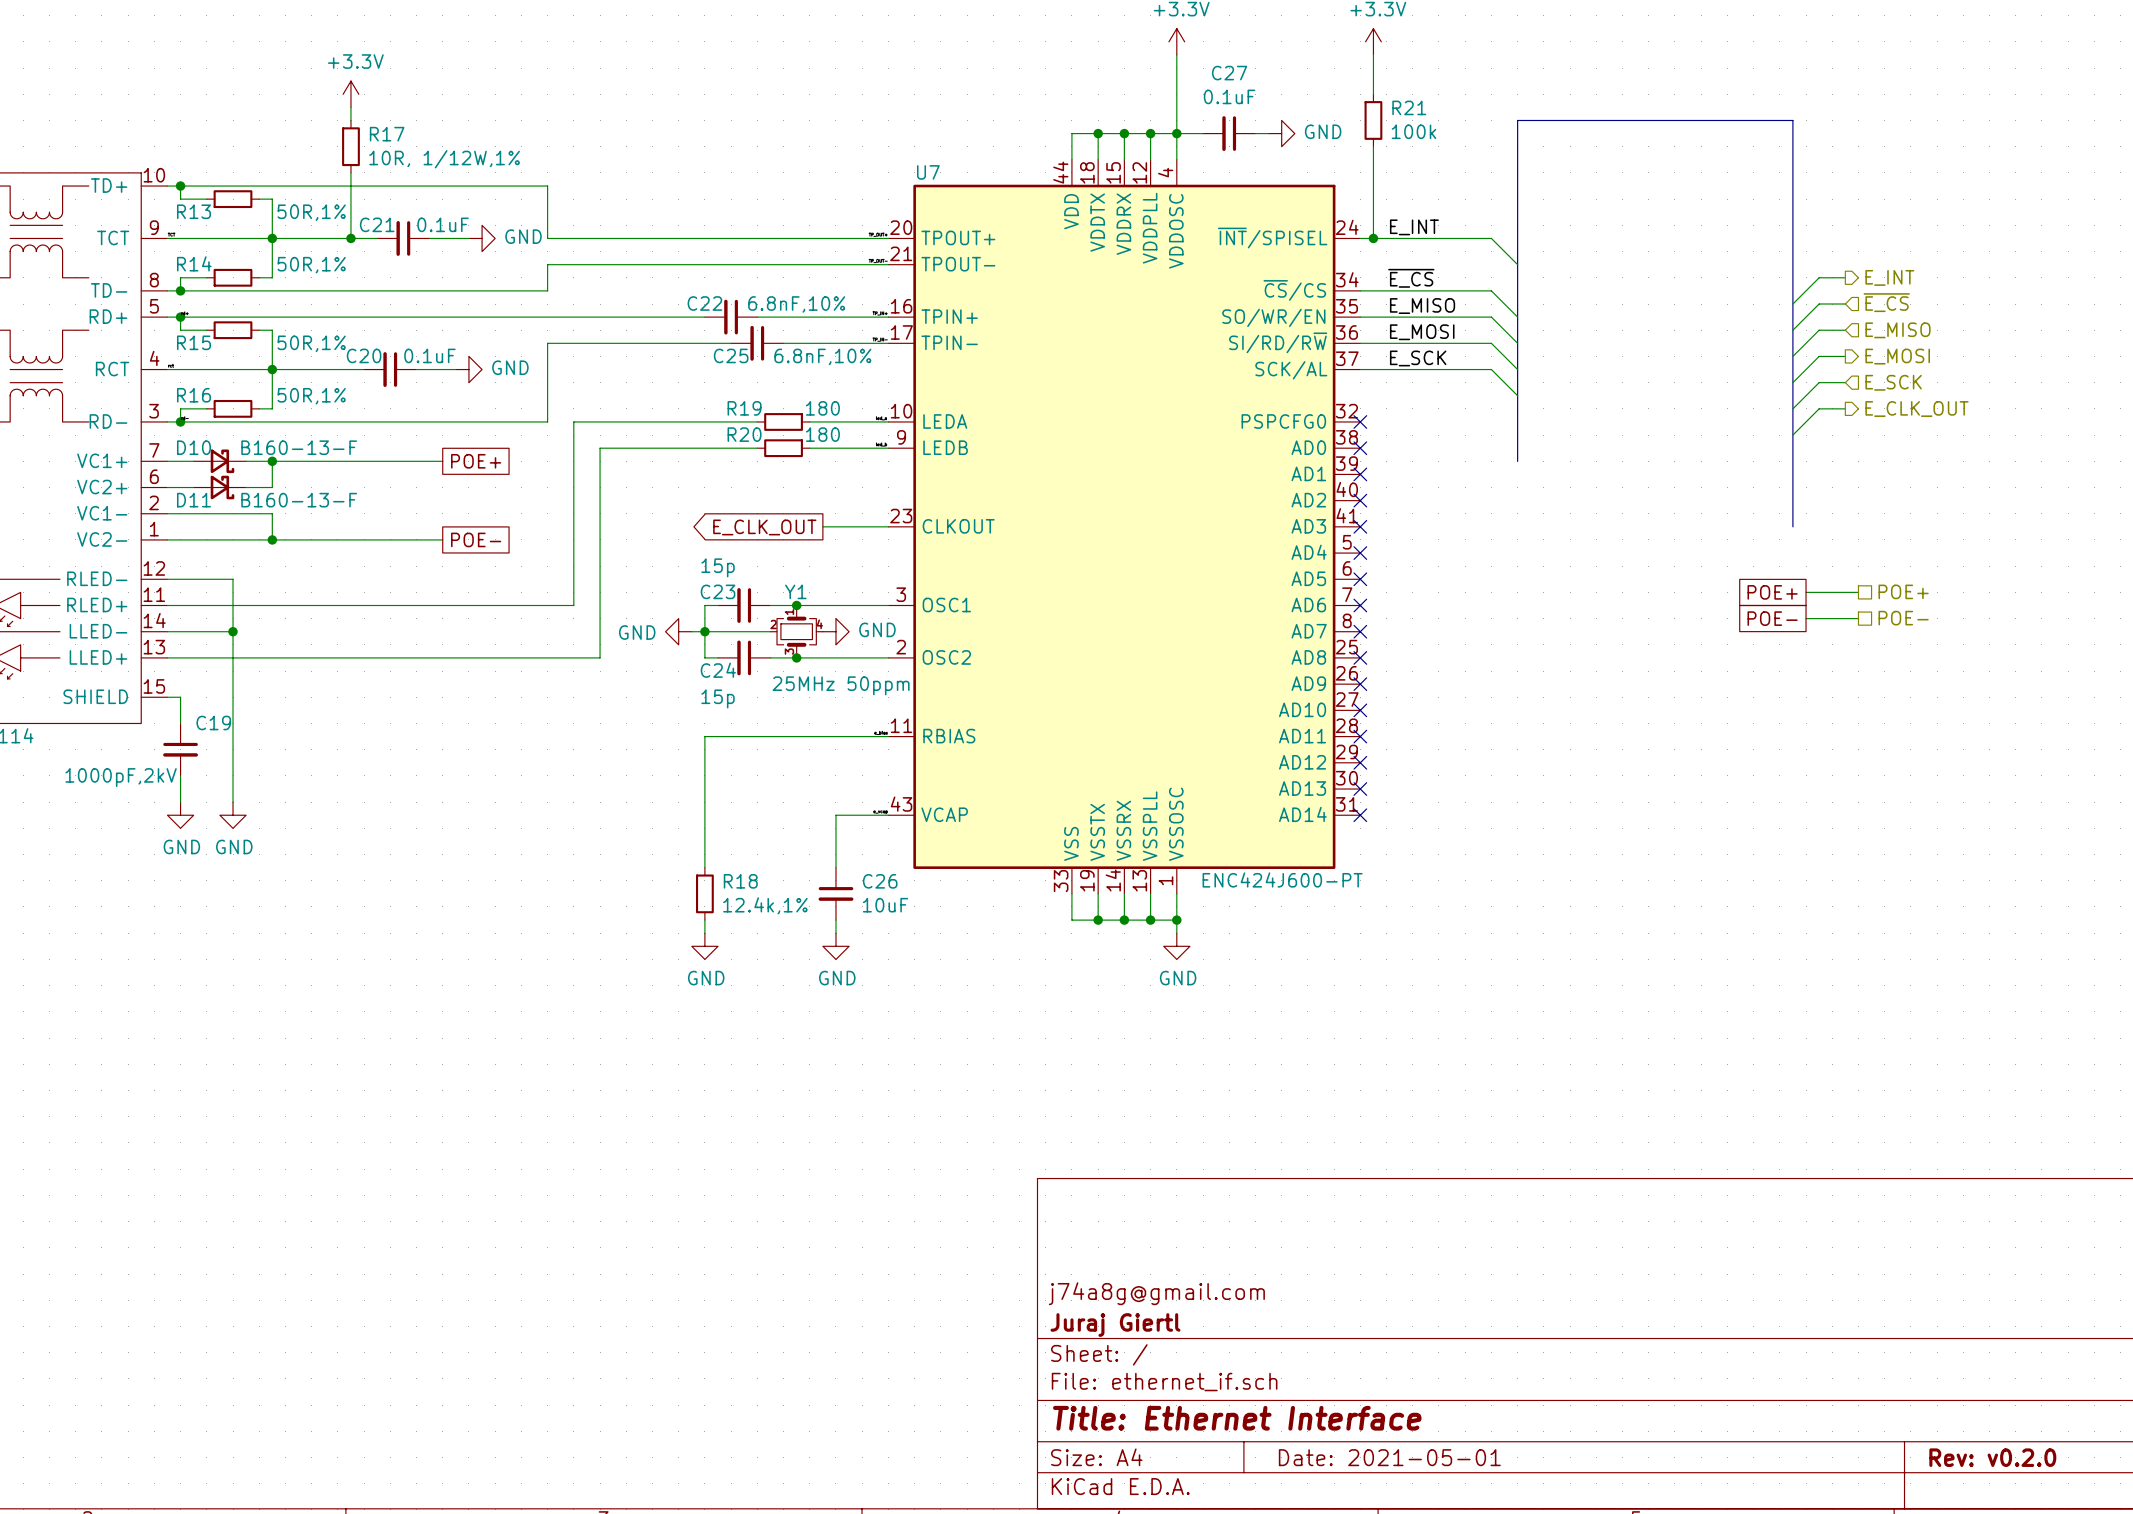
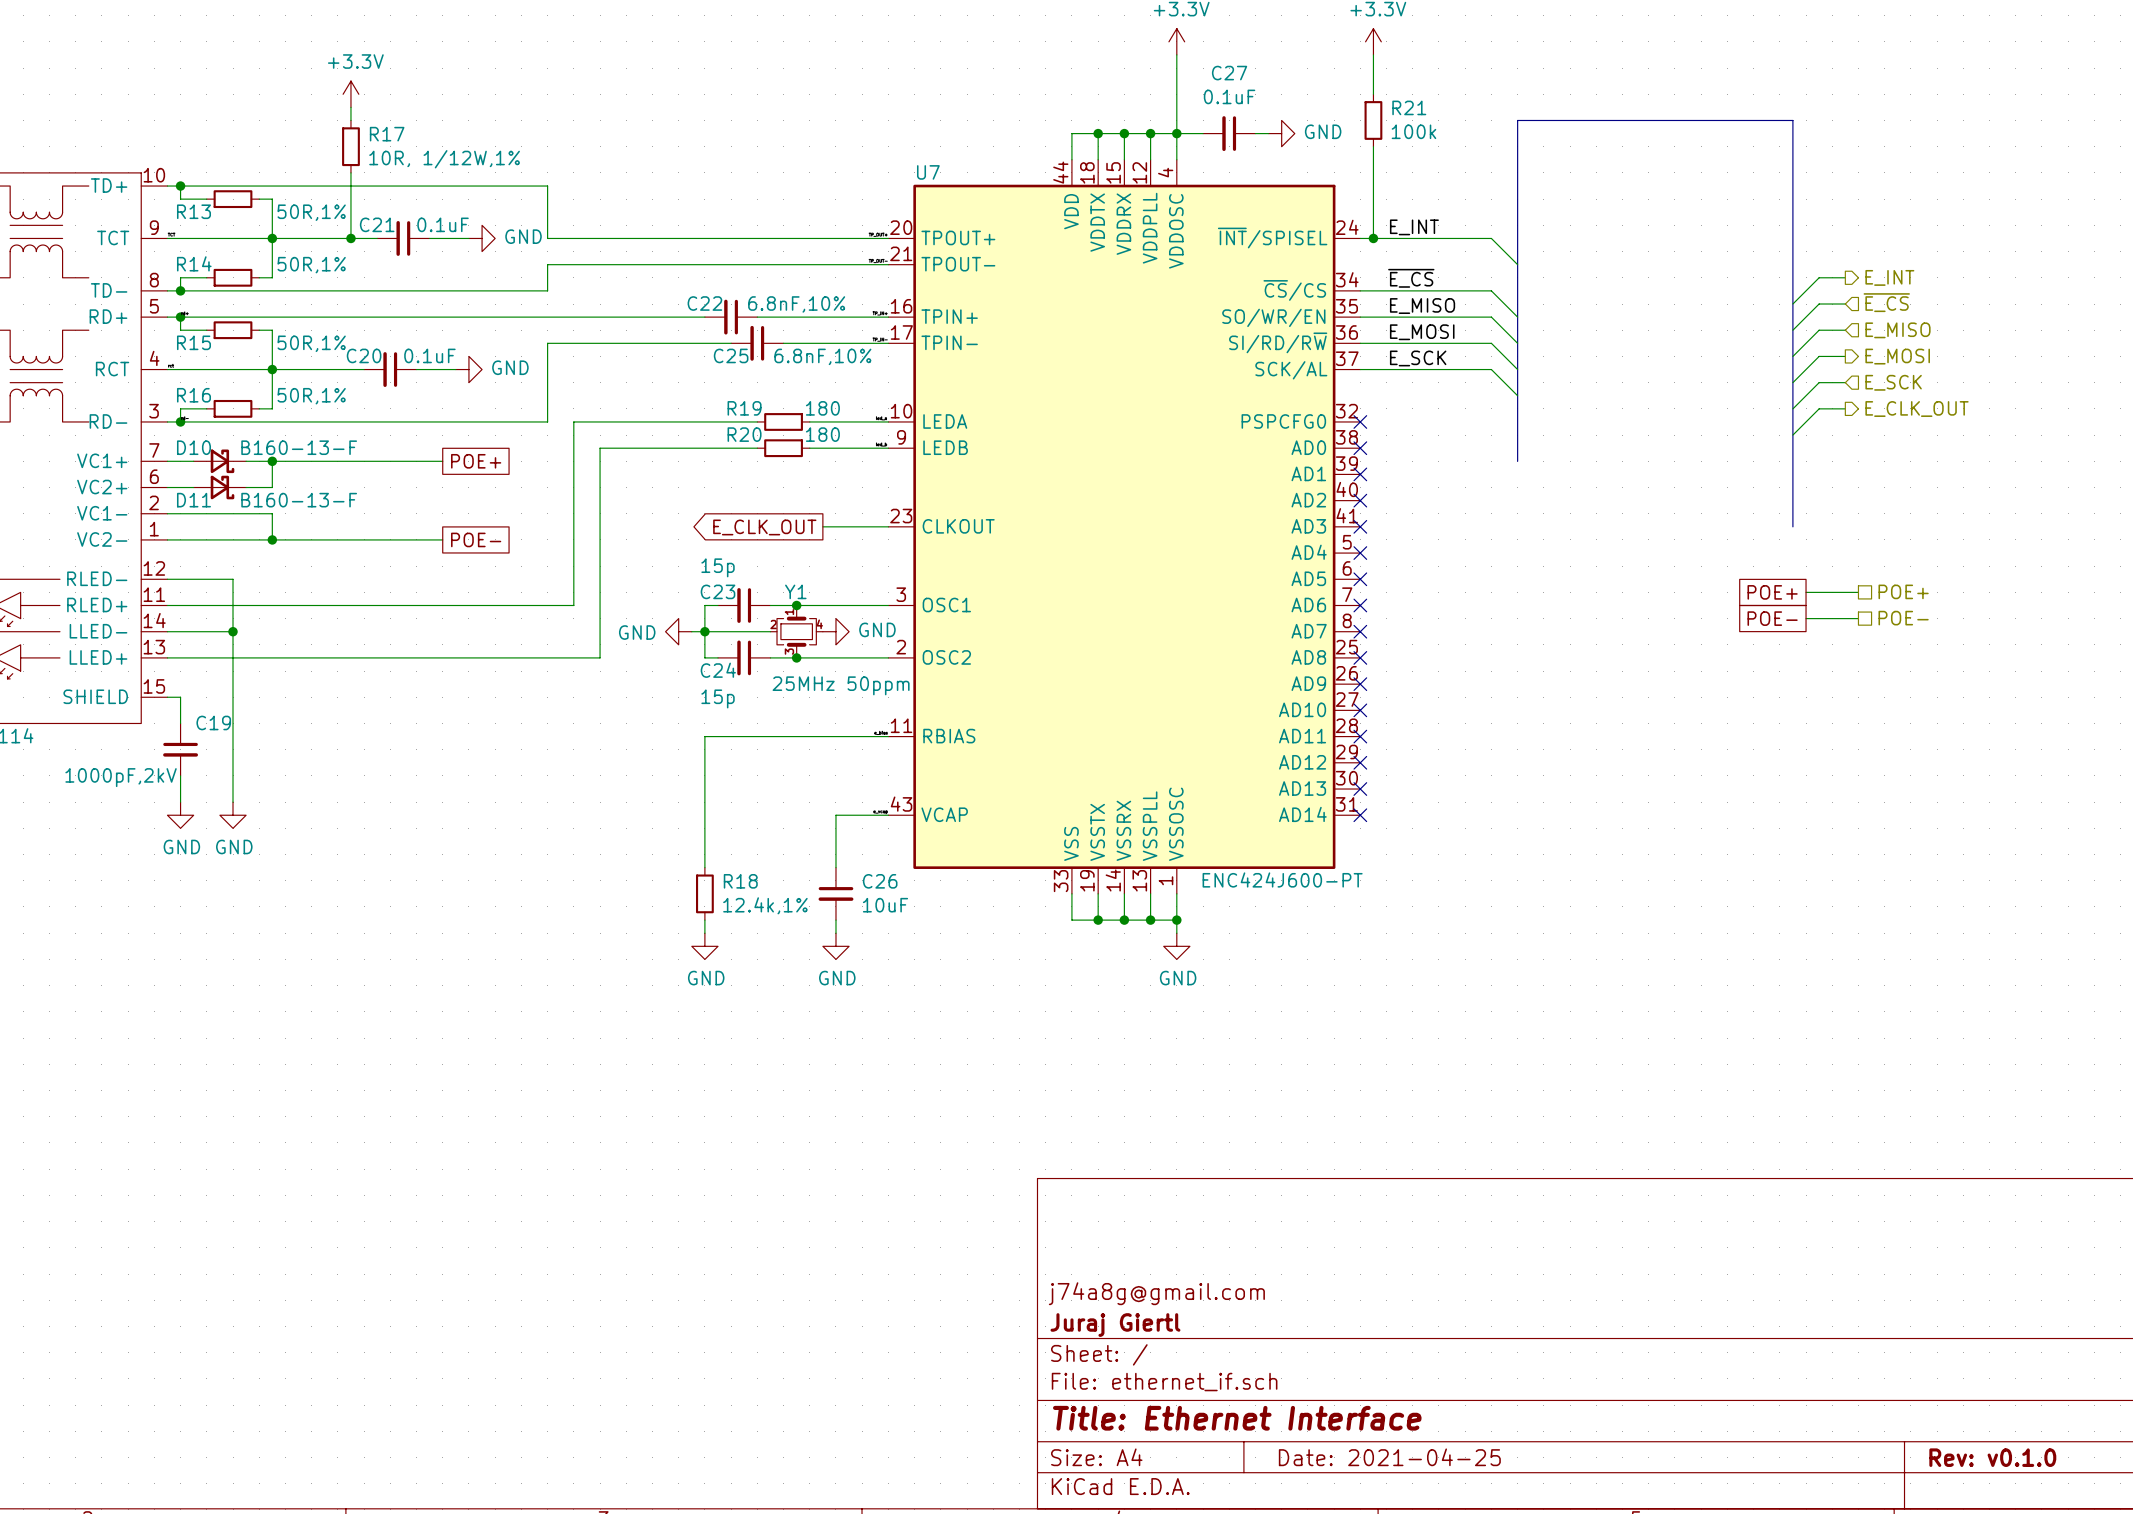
title block: Date: 2021-05-01 (1389, 1457) -> Date: 2021-04-25 (1389, 1457)
title block: Rev: v0.2.0 (1992, 1457) -> Rev: v0.1.0 (1992, 1457)

